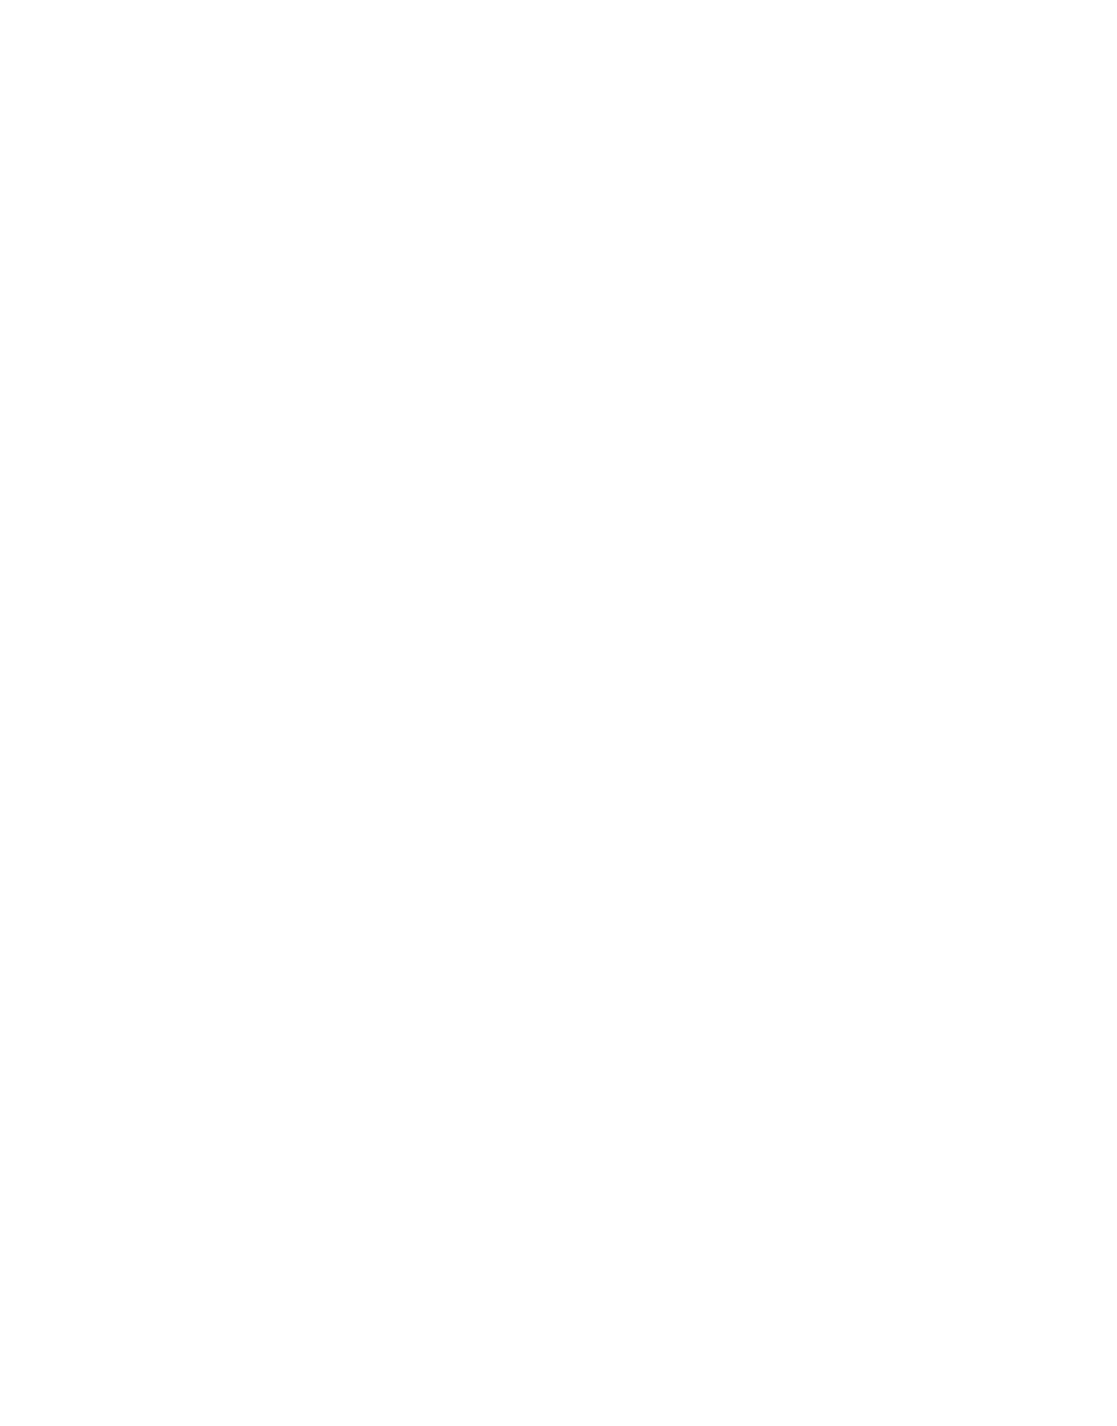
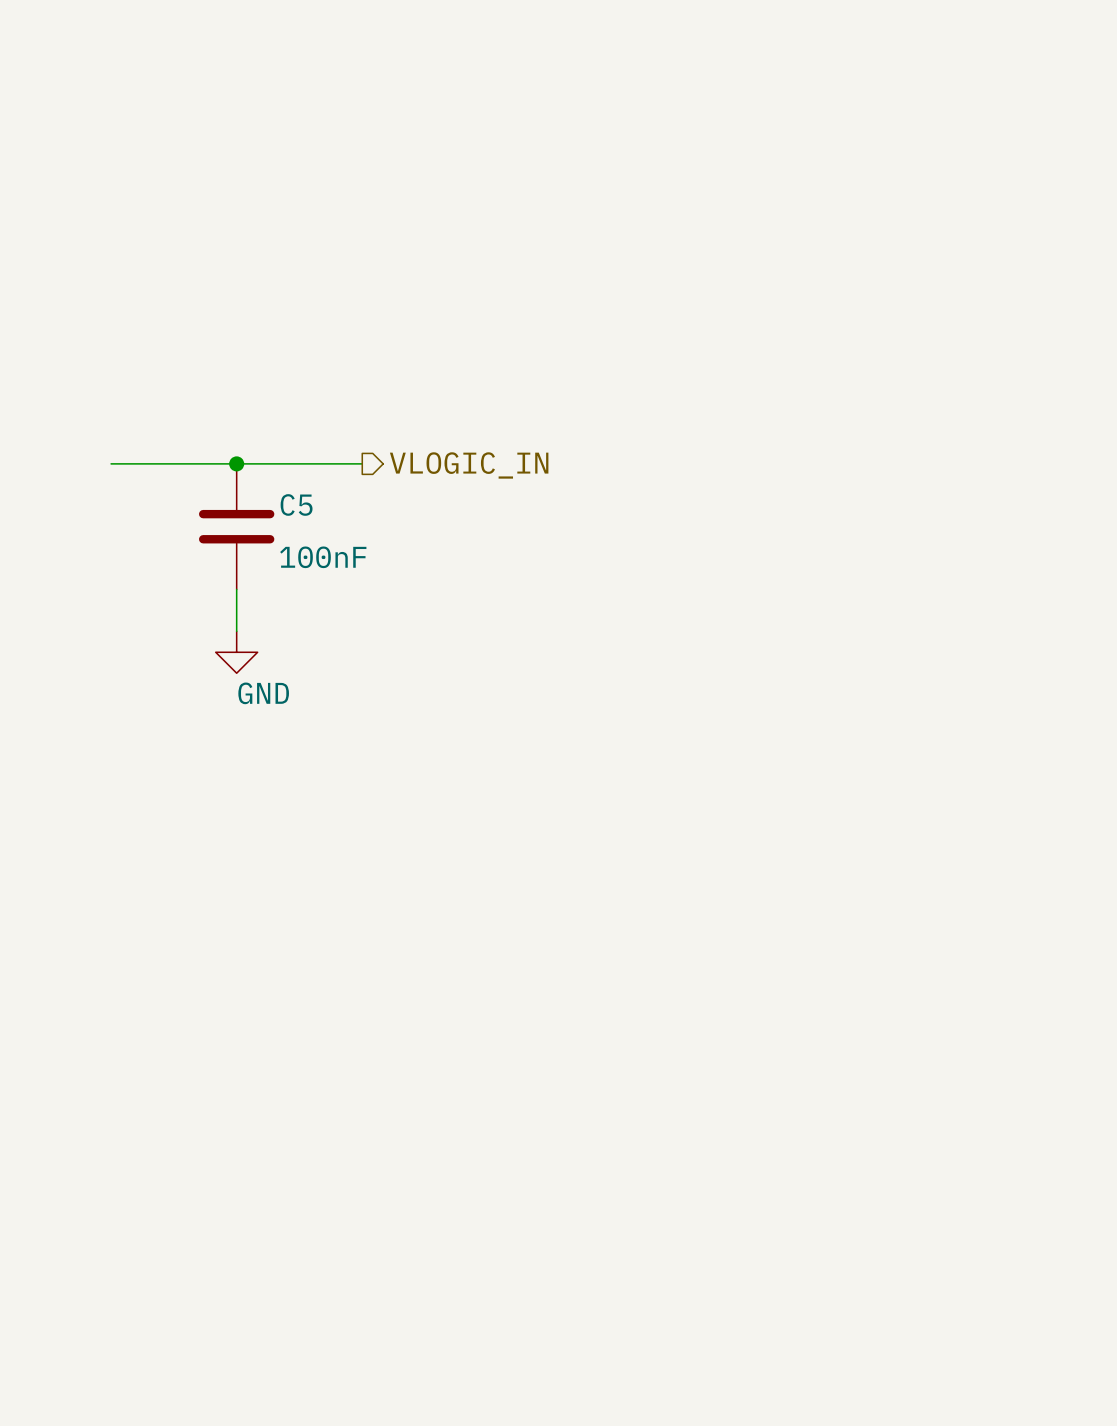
wire: none -> (111, 463) (362, 463)
junction: none -> (236, 463)
hierarchical label: none -> VLOGIC_IN (469, 465)
C5: none -> 100nF (236, 526)
wire: none -> (236, 589) (236, 631)
power symbol: none -> GND (236, 652)

